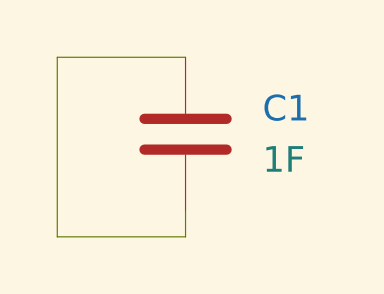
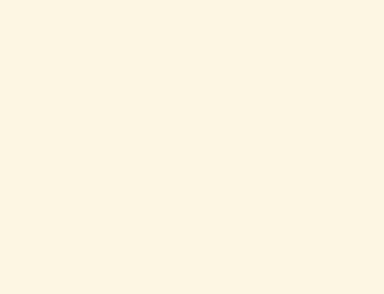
wire: (185, 57) (57, 57) (57, 236) (185, 236) (185, 211) -> none
C1: 1F (185, 134) -> none

